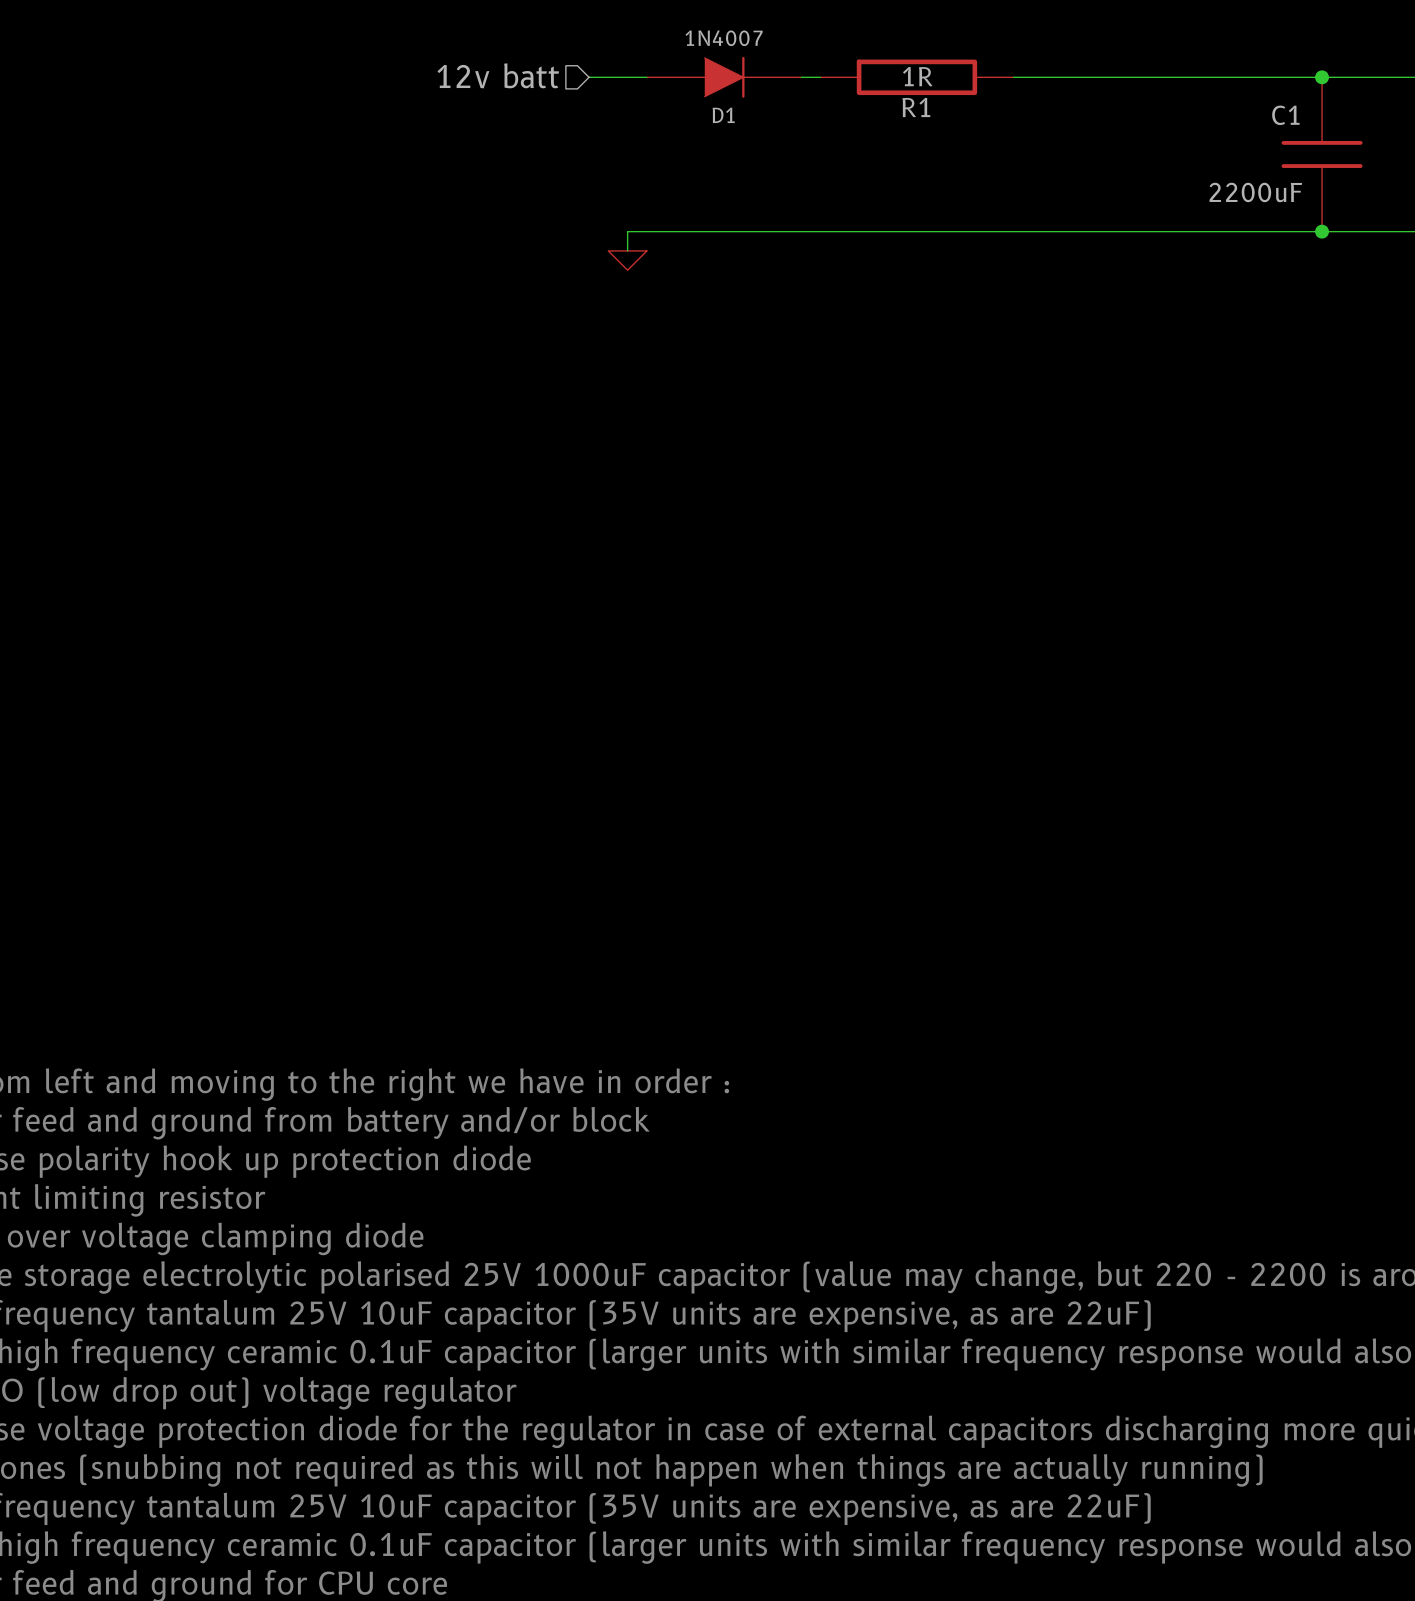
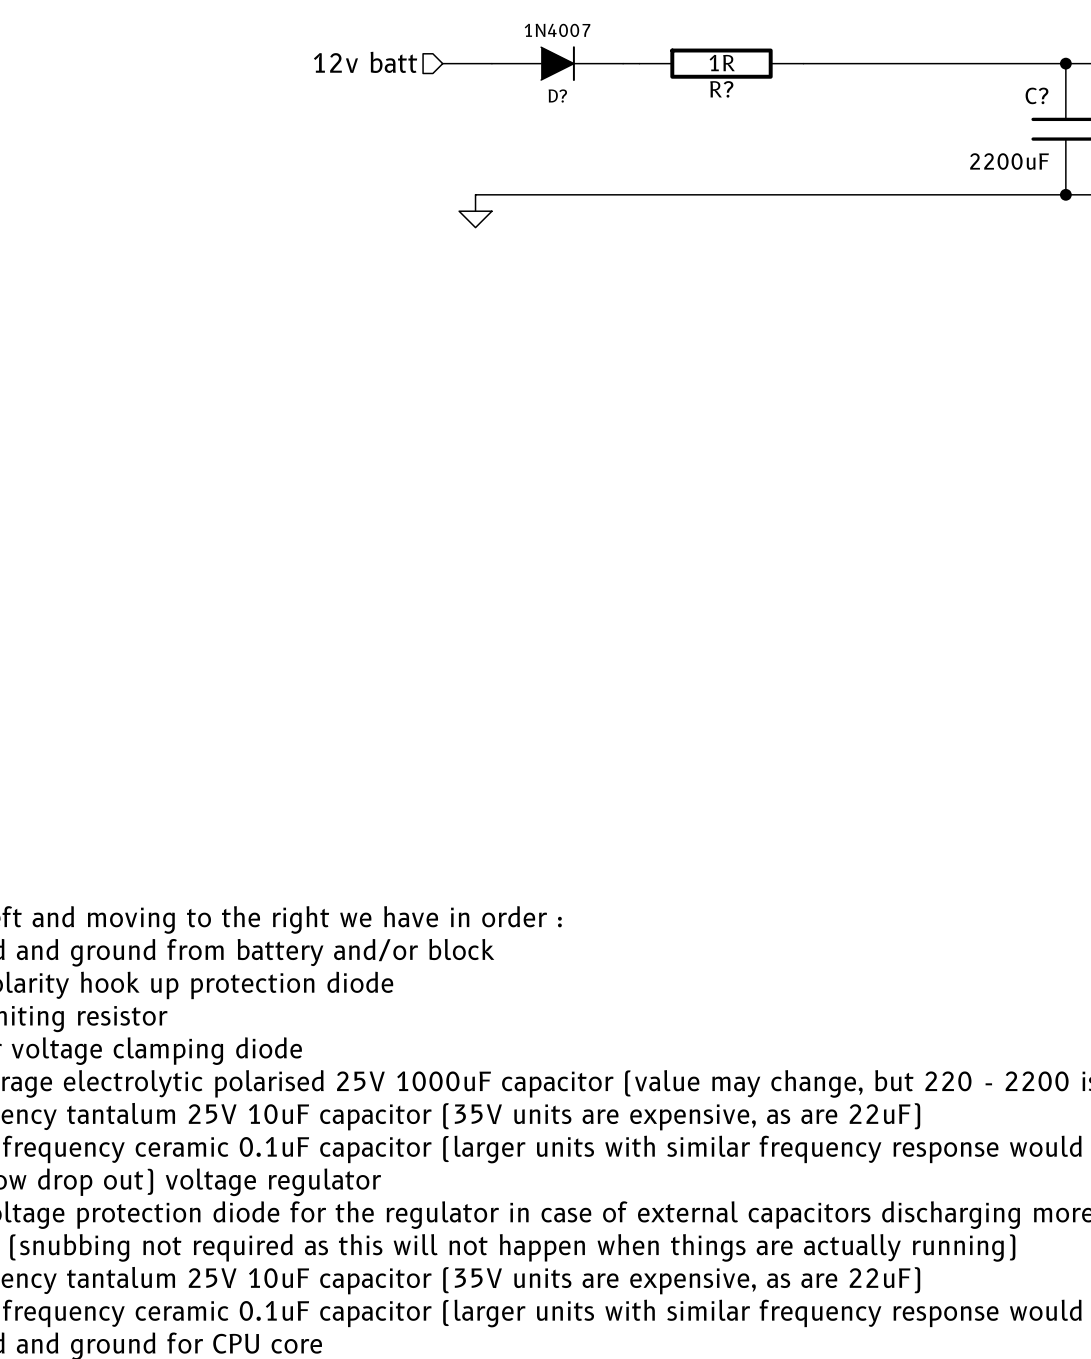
R1 name: R1 (916, 107) -> R? (721, 89)
D1 name: D1 (723, 115) -> D? (557, 96)
C1 name: C1 (1285, 115) -> C? (1036, 95)

